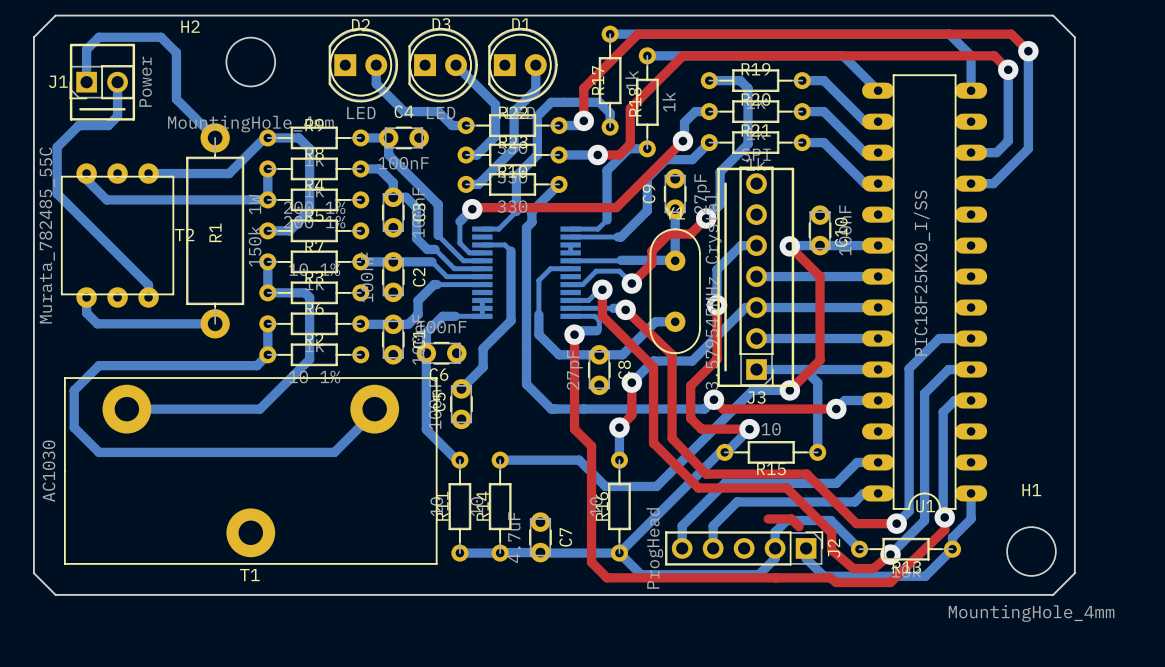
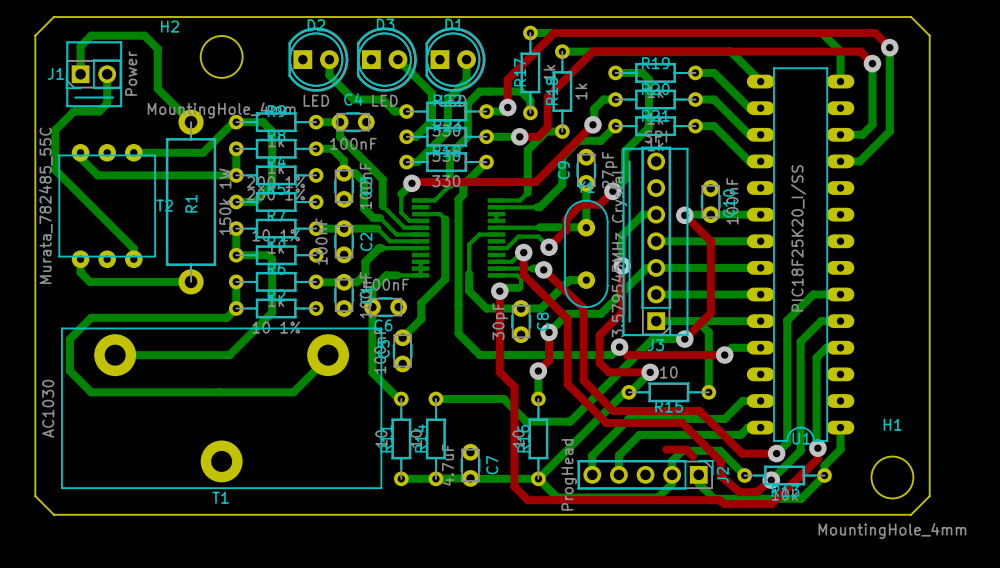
C8 value: 27pF (574, 370) -> 30pF (500, 321)

